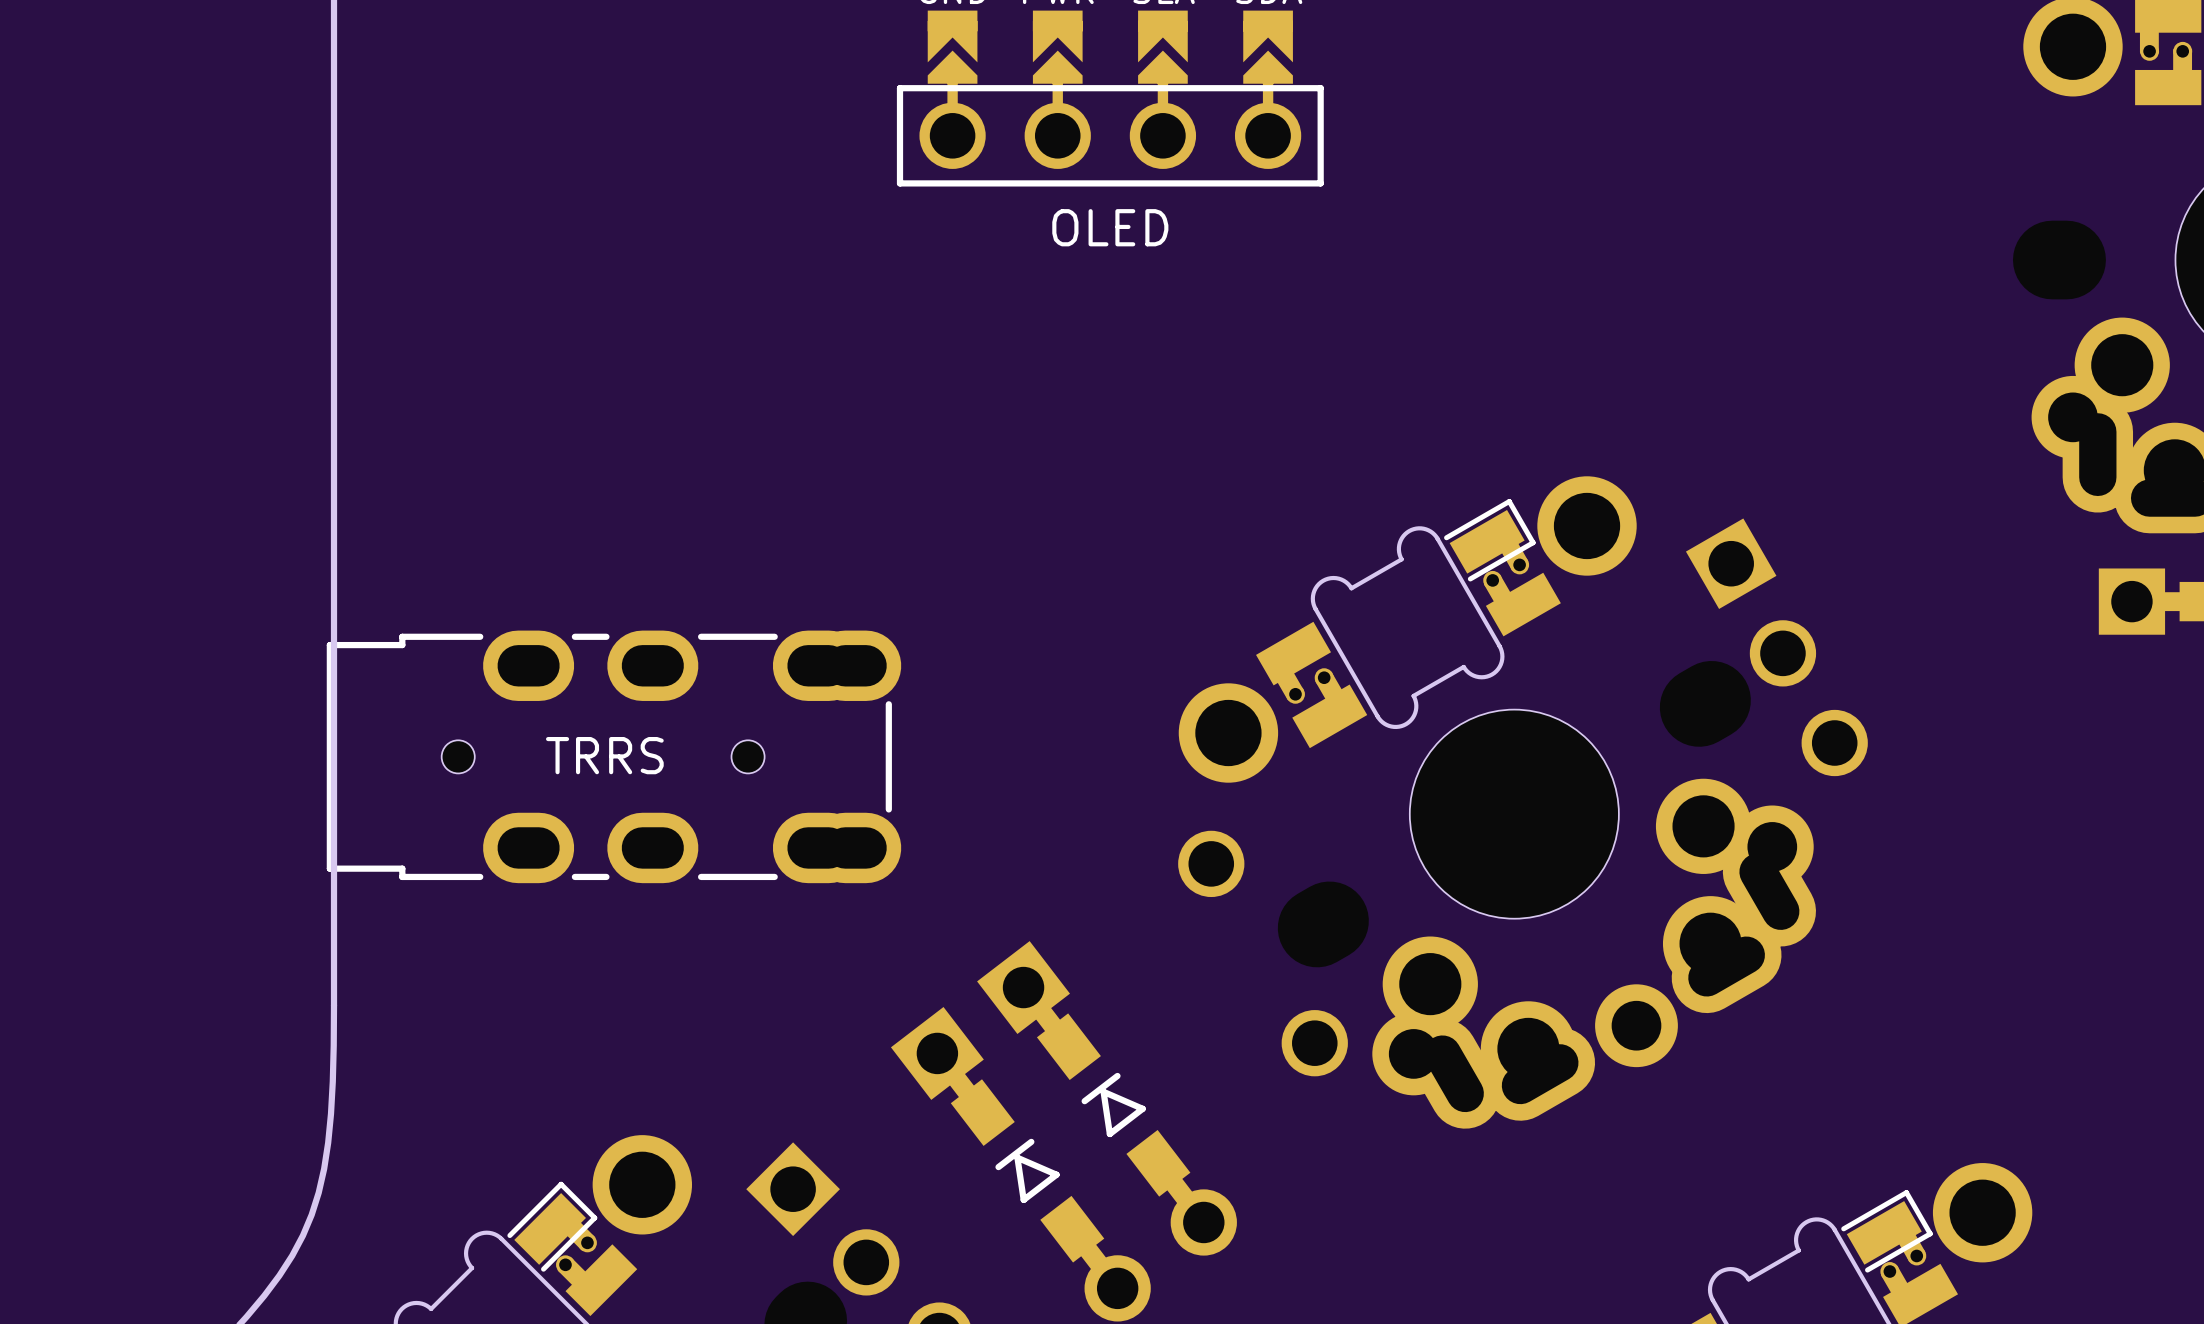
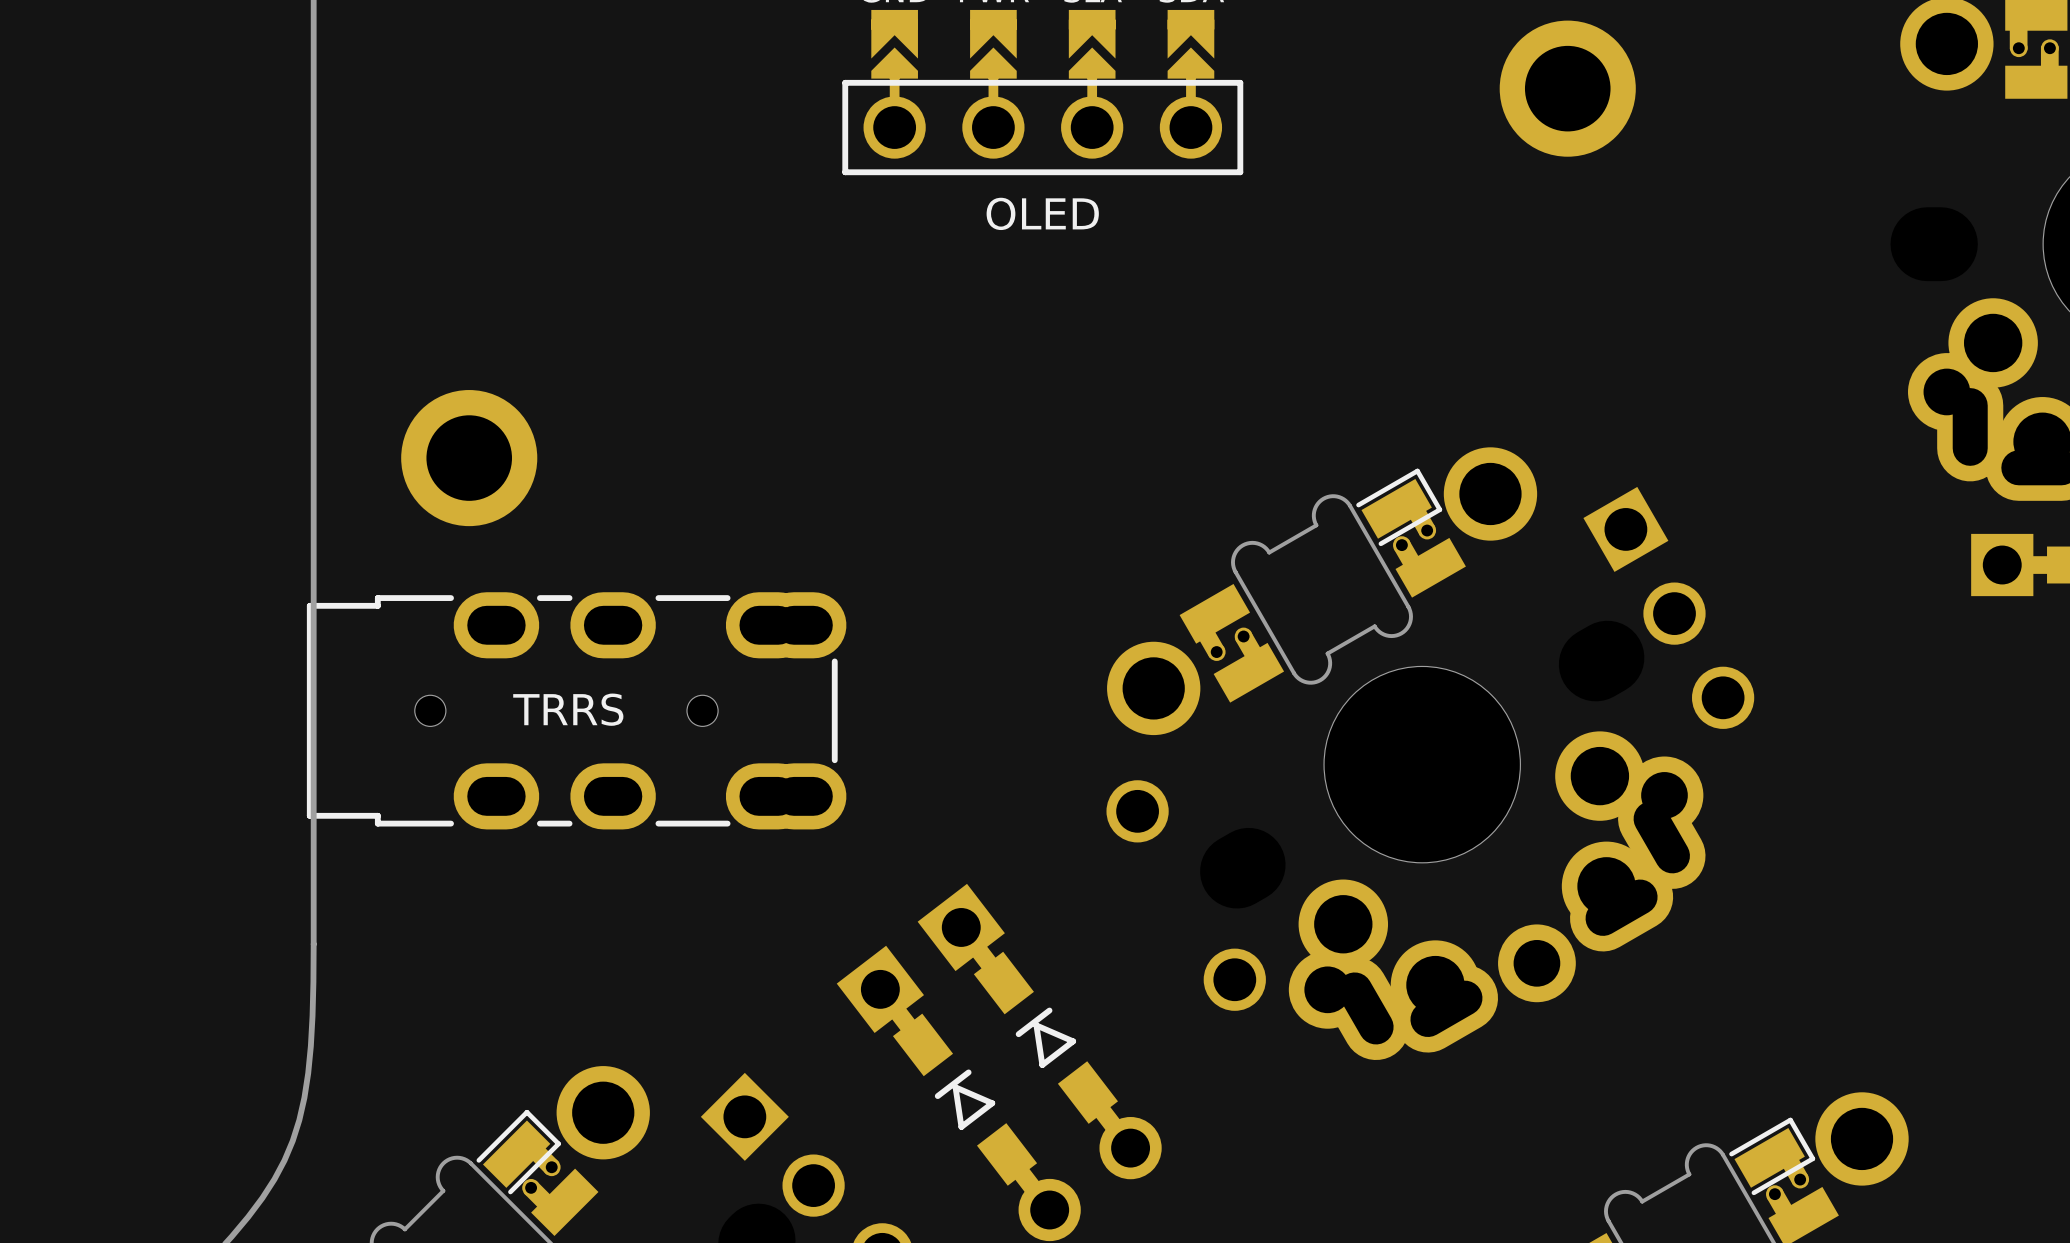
part: none -> (1567, 88)
part: none -> (469, 458)

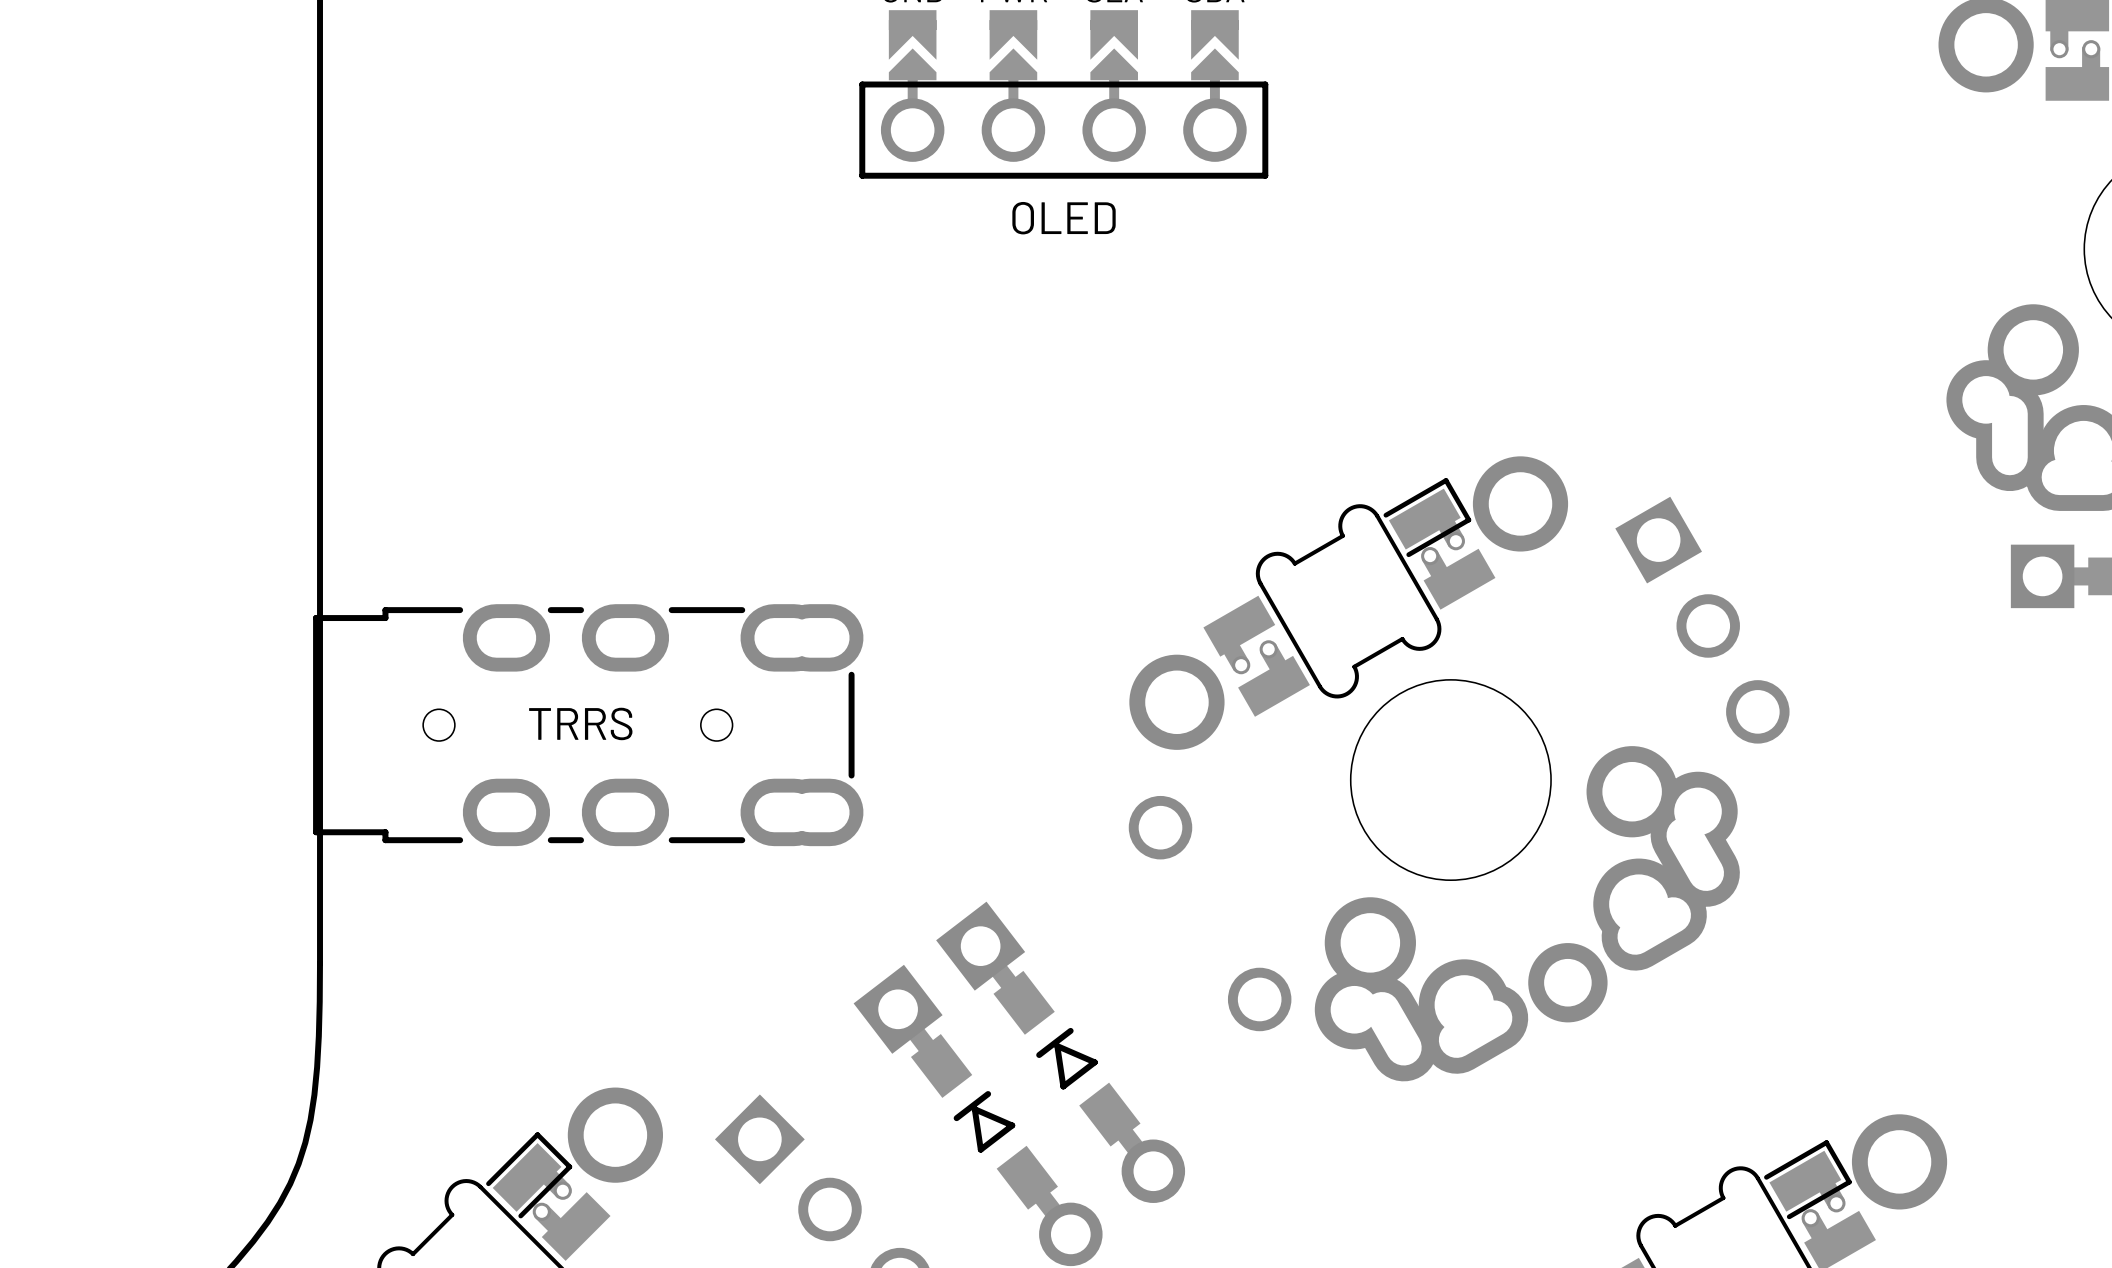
part: (1567, 88) -> none
part: (469, 458) -> none

